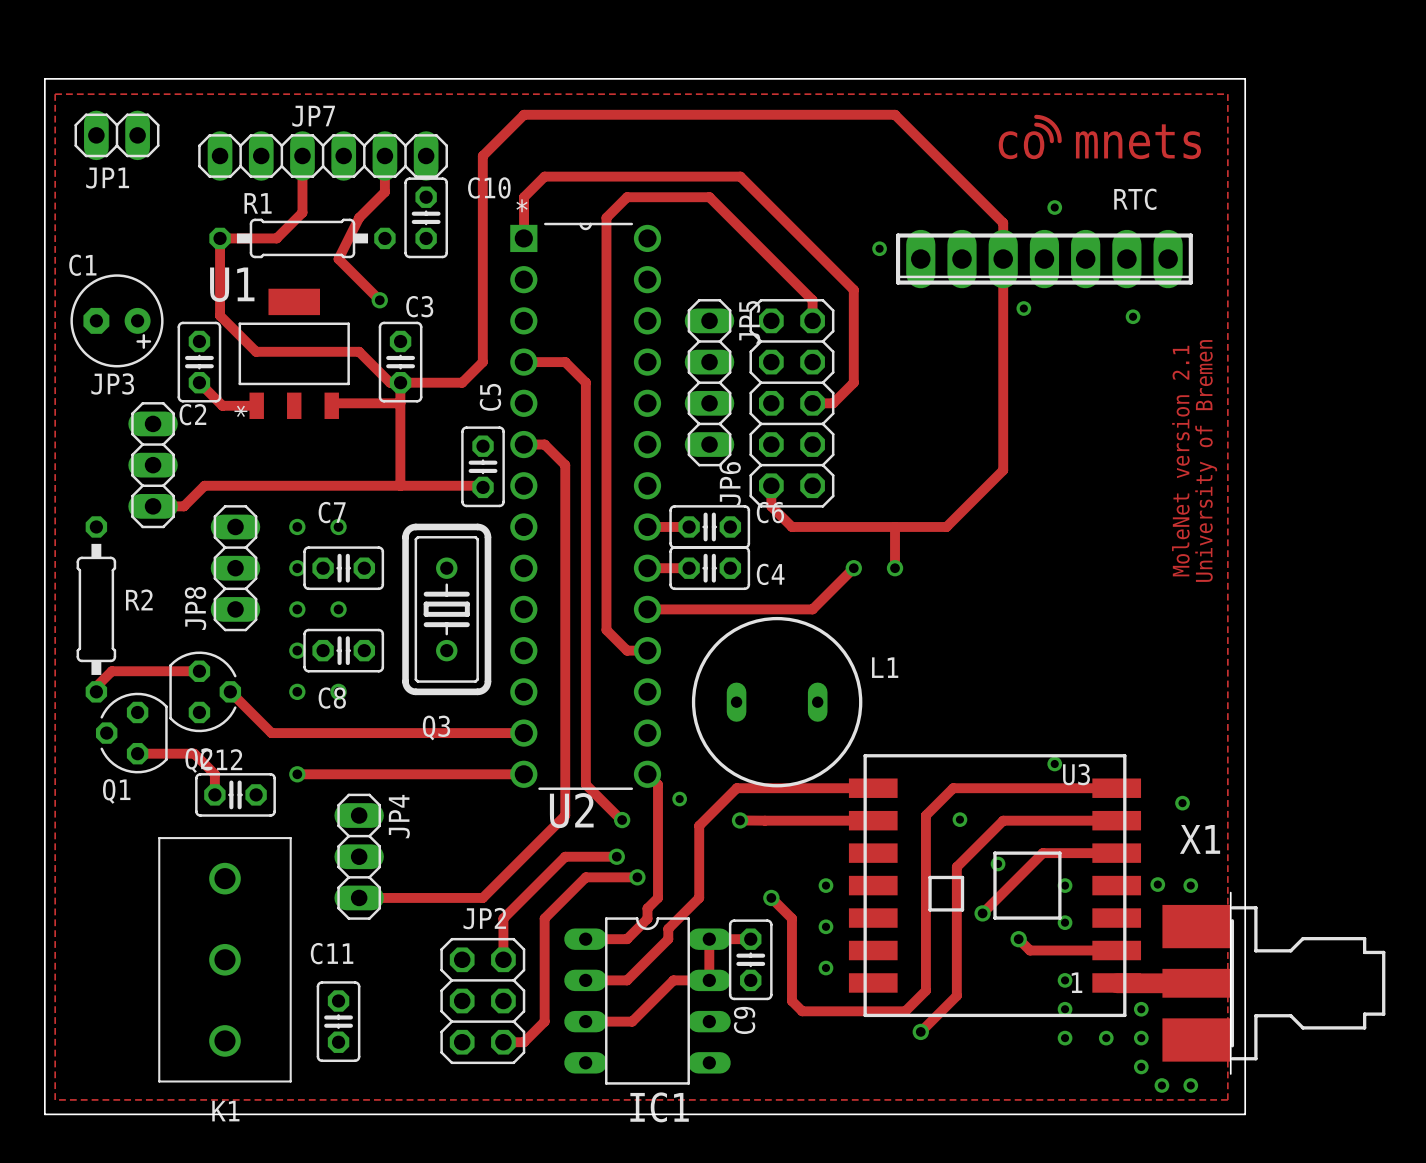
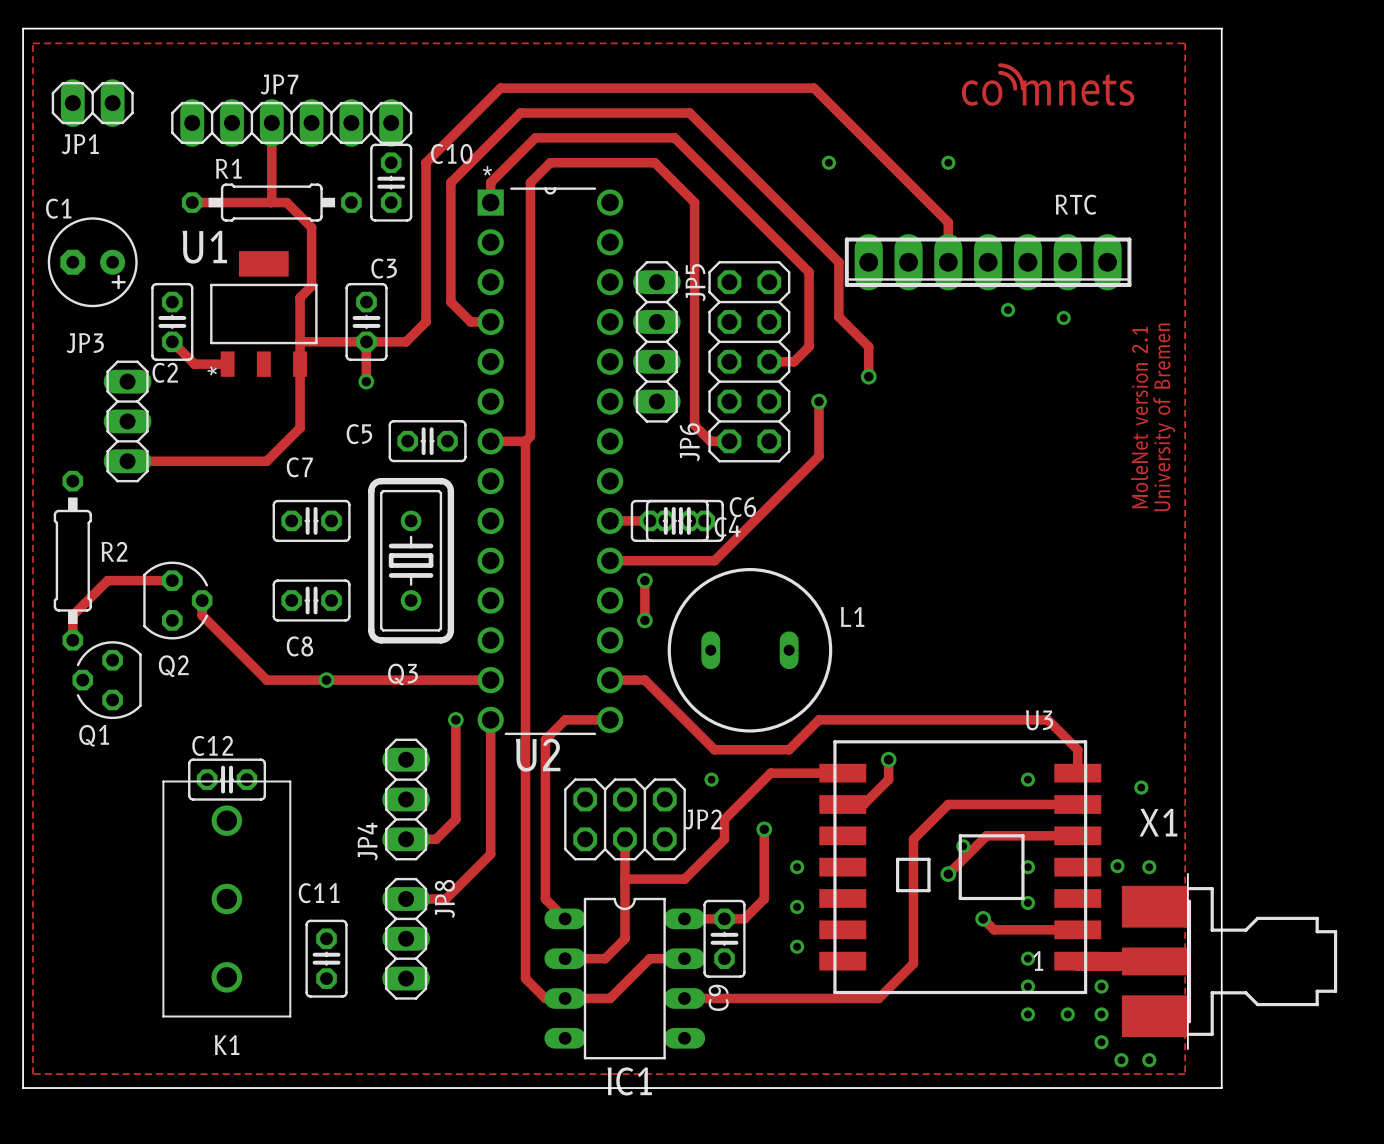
zone outline: (1227, 94) (55, 94) (55, 1099) -> (1185, 103) (1185, 43) (33, 43) (33, 1074) (52, 1074)
track: none -> (271, 122) (270, 202)
track: (1036, 116) (1045, 118) (1052, 124) (1058, 131) (1059, 141) -> (1000, 65) (1008, 67) (1016, 72) (1021, 79) (1022, 88)
track: (1036, 124) (1047, 129) (1051, 141) -> (1000, 72) (1010, 77) (1015, 88)
JP1 position: (116, 135) -> (92, 103)
text position: co mnets (1099, 141) -> co mnets (1048, 89)
track: (302, 156) (302, 212) (276, 238) (220, 238) (220, 315) (256, 351) (359, 351) (390, 382) (462, 382) (482, 362) (482, 156) (524, 114) (895, 114) (1003, 222) (1003, 470) (946, 526) (791, 526) (771, 506) (771, 485) -> none
JP7 position: (323, 156) -> (291, 122)
track: (384, 156) (384, 192) (359, 217) (338, 259) (379, 300) -> none
via: none -> (828, 162)
via: none -> (948, 162)
track: none -> (192, 202) (286, 202) (311, 227) (311, 286) (300, 297) (300, 428) (266, 461) (127, 461)
track: none -> (490, 202) (490, 182) (535, 137) (674, 137) (809, 272) (809, 346) (794, 361) (769, 361)
via: (1054, 207) -> none
C10 position: (426, 217) -> (391, 182)
R1 position: (302, 238) -> (271, 202)
track: (524, 238) (524, 197) (544, 176) (740, 176) (853, 289) (853, 382) (833, 403) (812, 403) -> none
via: (879, 248) -> none
track: none -> (948, 262) (948, 222) (814, 88) (500, 88) (426, 162) (426, 321) (406, 341) (300, 341)
RTC position: (1044, 259) -> (988, 262)
via: (379, 300) -> none
via position: (1023, 308) -> (1008, 310)
via position: (1133, 316) -> (1063, 317)
C1 position: (116, 320) -> (92, 262)
track: none -> (490, 321) (470, 321) (450, 302) (450, 182) (520, 113) (689, 113) (838, 262) (838, 316) (868, 346) (868, 376)
track: (812, 320) (812, 300) (709, 197) (627, 197) (606, 217) (606, 630) (627, 650) (647, 650) -> none
track: none -> (366, 342) (366, 381)
U1 position: (294, 353) -> (263, 313)
C2 position: (199, 362) -> (172, 321)
C3 position: (400, 362) -> (366, 321)
track: (523, 362) (565, 362) (585, 382) (585, 784) (622, 820) -> none
via: none -> (868, 376)
track: (199, 382) (222, 405) (256, 405) -> (172, 341) (194, 364) (227, 364)
via: none -> (366, 381)
track: (400, 382) (400, 485) -> none
JP5 position: (709, 382) -> (656, 341)
C5 name position: C5 (490, 397) -> C5 (359, 434)
track: (400, 403) (334, 403) (331, 405) -> none
JP6 position: (791, 403) -> (749, 361)
track: none -> (819, 401) (819, 456) (714, 560) (664, 560)
via: none -> (819, 401)
track: (544, 444) (565, 465) (565, 753) -> (610, 719) (565, 719) (545, 739)
text position: University of Bremen (1206, 460) -> University of Bremen (1164, 417)
text position: MoleNet version 2.1 (1180, 461) -> MoleNet version 2.1 (1139, 417)
JP3 position: (153, 465) -> (127, 421)
C5 rotation: 0° (483, 466) -> 90° clockwise (427, 441)
track: (483, 487) (481, 485) (204, 485) (183, 506) (153, 506) -> none
U2 position: (585, 506) -> (550, 461)
via: (297, 526) -> none
via: (338, 526) -> none
track: (895, 526) (895, 568) -> (644, 580) (644, 620)
JP8 position: (235, 568) -> (406, 938)
via: (297, 568) -> none
C7 position: (343, 568) -> (311, 520)
C4 position: (709, 568) -> (669, 520)
track: (853, 568) (812, 609) (647, 609) -> none
via: (853, 568) -> none
via: (895, 568) -> none
track: none -> (172, 580) (107, 580) (72, 615) (72, 640)
via: none -> (644, 580)
JP8 name position: JP8 (195, 608) -> JP8 (444, 898)
R2 position: (96, 609) -> (72, 560)
track: none -> (202, 600) (202, 615) (266, 680) (490, 680)
via: (297, 609) -> none
via: (338, 609) -> none
Q3 position: (446, 609) -> (411, 560)
via: none -> (644, 620)
via: (297, 650) -> none
C8 position: (343, 650) -> (311, 600)
track: (199, 671) (111, 671) (96, 686) (96, 691) -> none
Q2 position: (205, 691) -> (177, 600)
track: (230, 691) (271, 733) (523, 733) -> none
via: (297, 691) -> none
L1 position: (777, 702) -> (749, 650)
Q1 position: (131, 733) -> (107, 680)
track: none -> (455, 719) (455, 819) (435, 839) (406, 839)
via: none -> (455, 719)
track: (137, 753) (194, 753) (214, 774) (214, 794) -> none
via position: (1054, 763) -> (1027, 779)
track: (297, 774) (523, 774) -> none
via: (297, 774) -> none
track: (647, 774) (658, 784) (658, 897) (647, 908) (647, 918) (627, 939) (585, 939) -> (545, 799) (545, 899) (565, 918)
via: none -> (888, 759)
U3 name position: U3 (1076, 774) -> U3 (1039, 720)
track: (798, 788) (736, 788) (699, 825) (699, 897) (668, 928) (668, 939) (647, 959) -> (770, 773) (724, 819) (724, 839) (684, 879) (625, 879)
track: (1116, 788) (953, 788) (925, 815) (925, 990) (905, 1011) (802, 1011) (791, 1001) (791, 918) (771, 897) -> (1077, 773) (1077, 749) (1047, 719) (819, 719) (789, 749) (714, 749) (644, 680) (610, 680)
via position: (679, 799) -> (711, 779)
track: (565, 815) (508, 872) -> (490, 719) (490, 854)
JP4 name position: JP4 (399, 816) -> JP4 (367, 841)
via: (959, 819) -> none
via: (622, 820) -> none
track: (740, 820) (873, 820) -> (888, 759) (888, 779) (863, 804) (842, 804)
via: (740, 820) -> none
track: (1003, 820) (956, 867) (956, 995) (920, 1031) -> (968, 804) (948, 804) (913, 839) (913, 963) (878, 998) (684, 998)
track: none -> (764, 829) (764, 899) (744, 918) (724, 918)
via: none -> (764, 829)
track: (1042, 853) (982, 913) -> (1006, 835) (986, 835) (948, 874)
JP4 position: (359, 856) -> (406, 799)
track: (616, 856) (565, 856) (503, 918) (503, 959) -> none
via: (616, 856) -> none
track: none -> (625, 839) (625, 938)
track: (637, 877) (585, 877) (544, 918) -> (729, 441) (710, 441) (694, 425) (694, 202) (654, 162) (550, 162) (530, 182) (530, 436) (525, 441) (525, 899)
via: (637, 877) -> none
track: (359, 897) (482, 897) -> (406, 899) (445, 899) (465, 879)
via: (771, 897) -> none
via position: (982, 913) -> (948, 874)
track: (709, 939) (709, 980) -> none
K1 position: (224, 959) -> (226, 899)
JP2 rotation: 0° (482, 1001) -> 90° clockwise (625, 819)
JP2 position: (482, 1001) -> (625, 819)
track: (544, 1001) (544, 1021) (524, 1042) (503, 1042) -> (525, 978) (545, 998) (565, 998)
C11 position: (338, 1021) -> (326, 958)
via: (920, 1031) -> none
board edge: (44, 1114) (44, 78) (1245, 78) (1245, 1114) -> (42, 1088) (23, 1088) (23, 28) (1221, 28) (1221, 1088) (1201, 1088)

